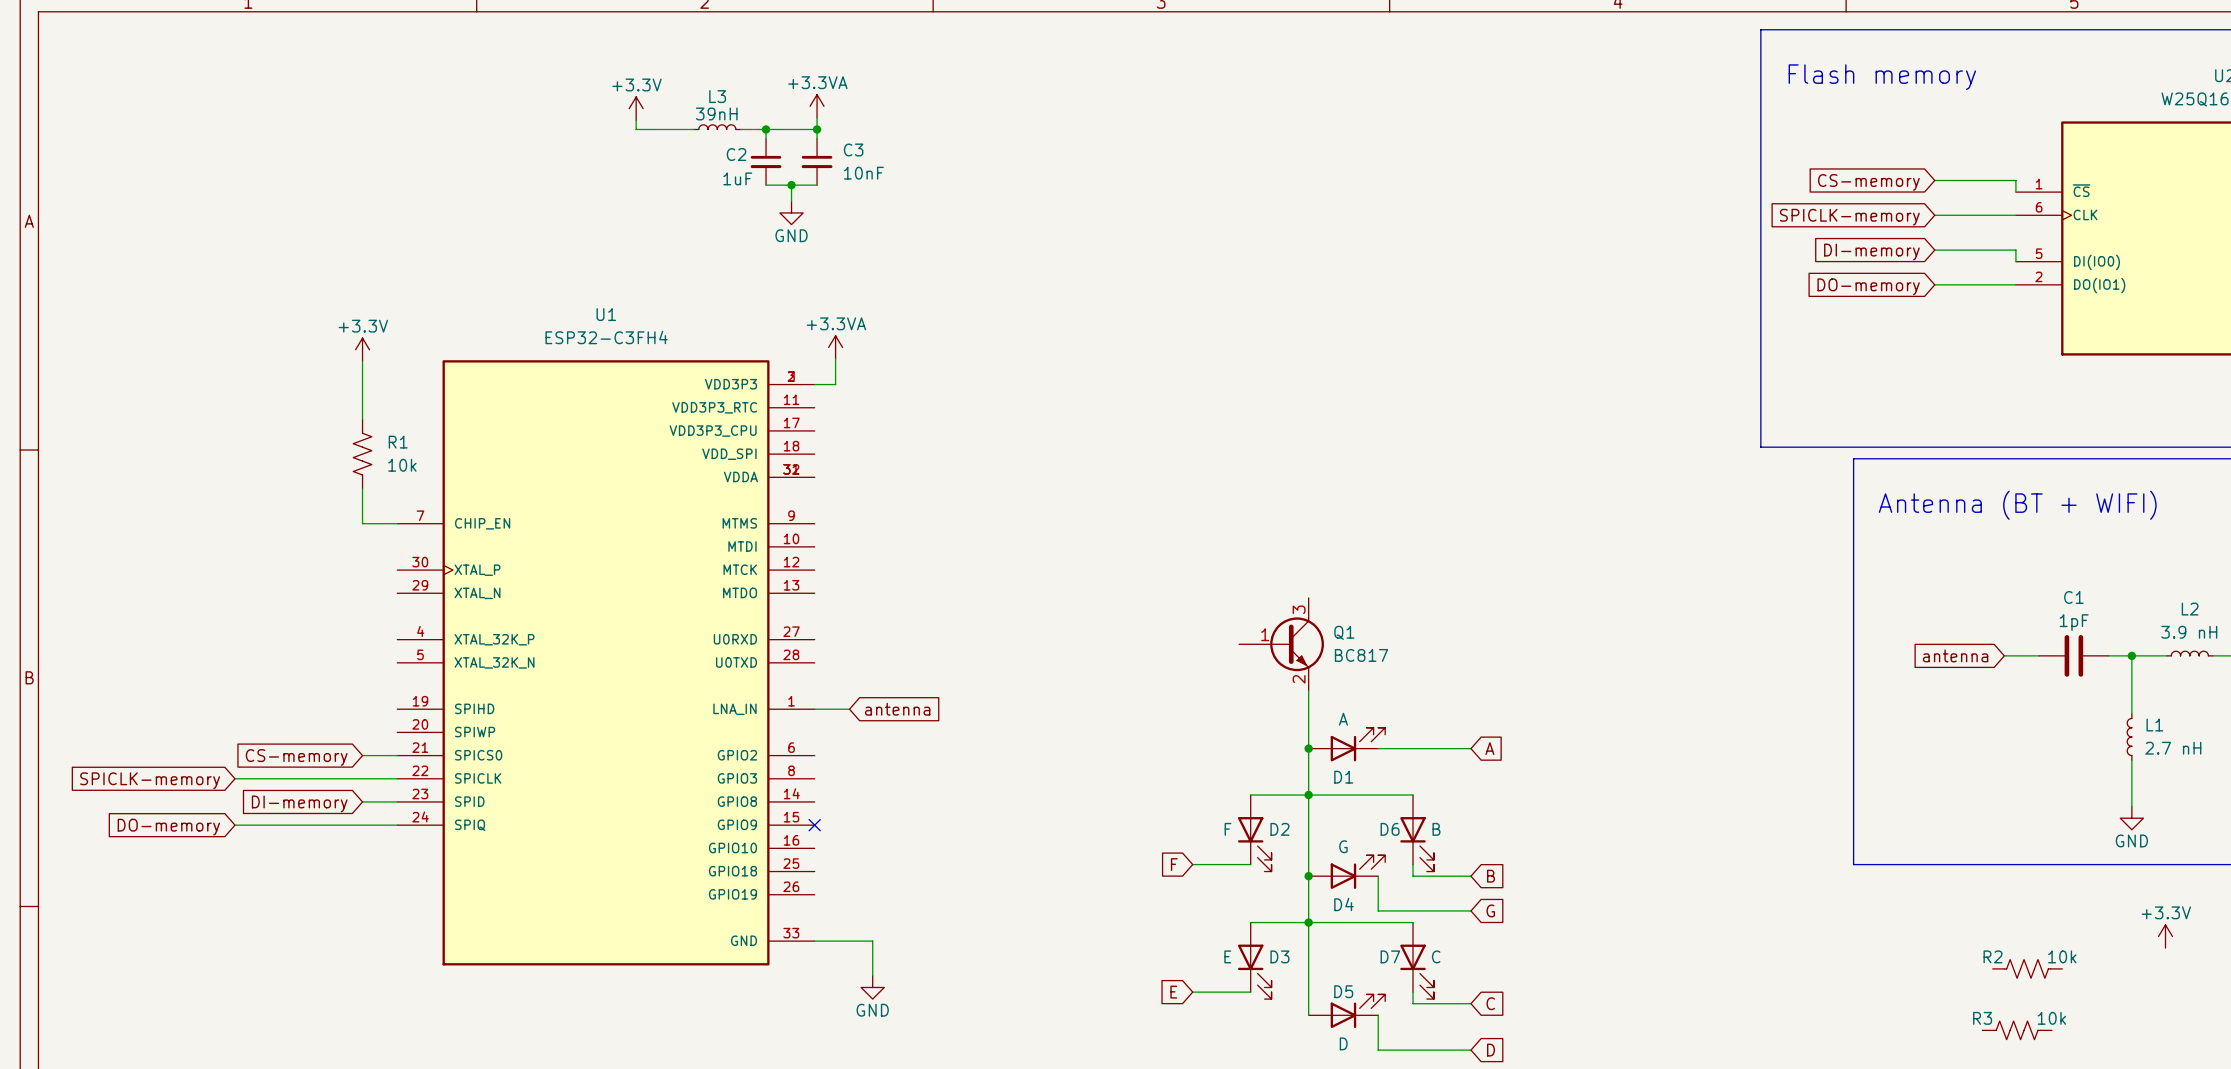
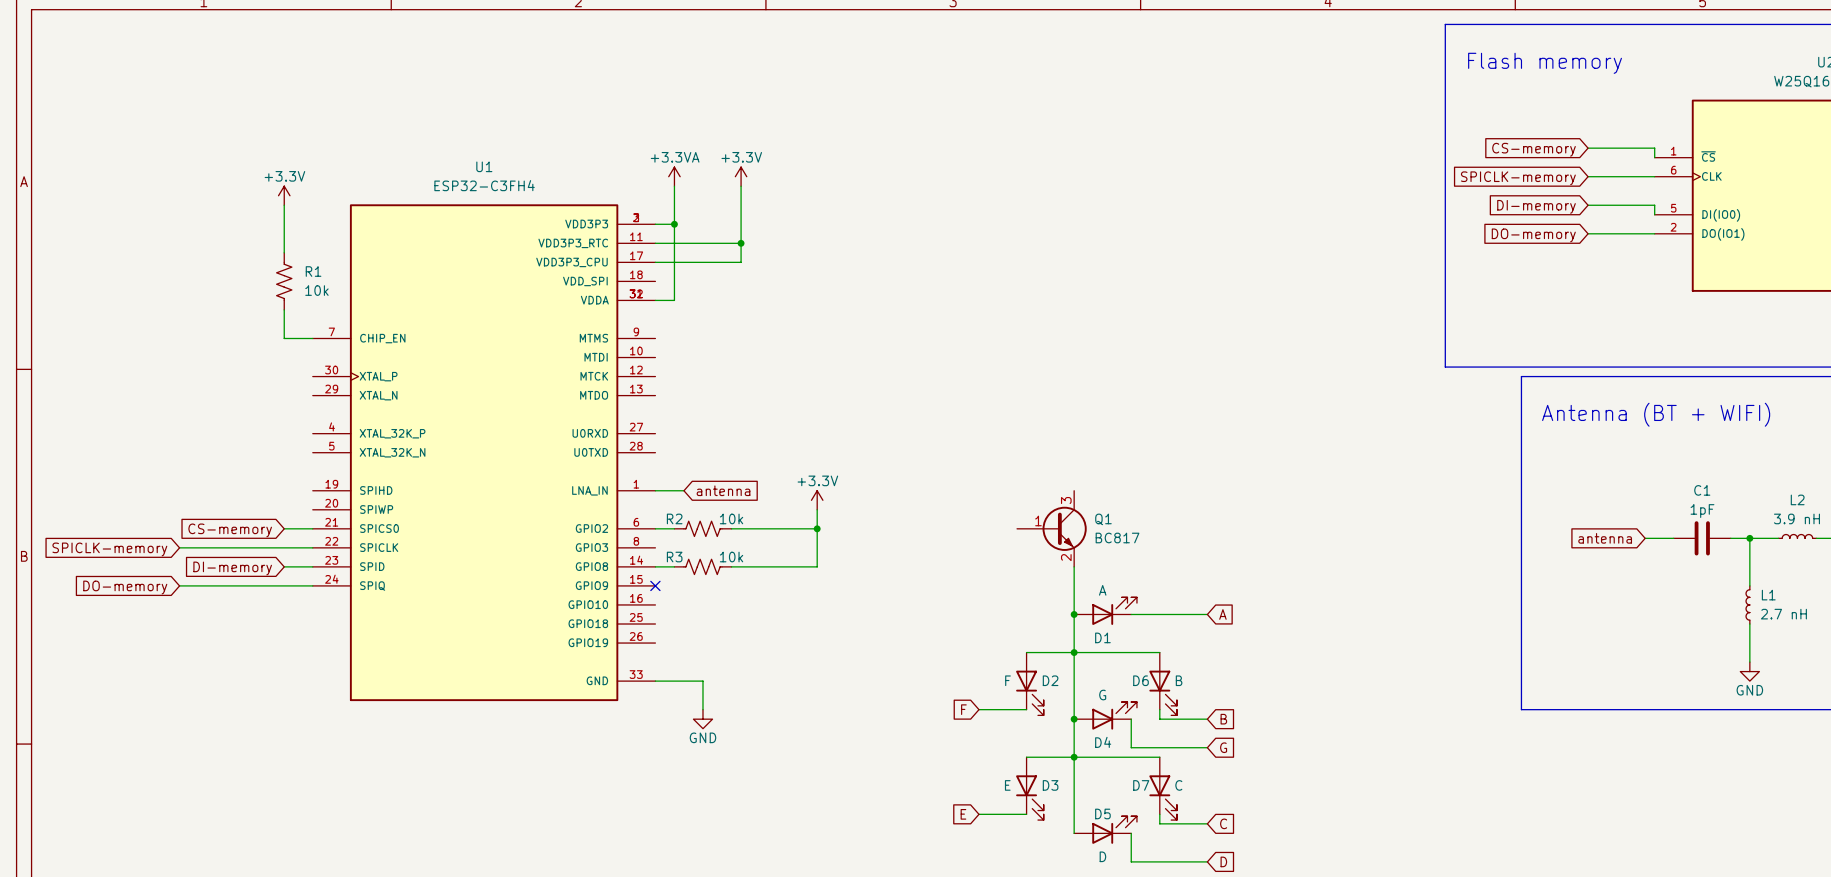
power symbol: +3.3VA (817, 106) -> none
power symbol: +3.3V (636, 108) -> none
wire: (817, 117) (817, 138) -> none
wire: (636, 120) (636, 129) (694, 129) -> none
L3: 39nH (717, 127) -> none
wire: (740, 129) (817, 129) -> none
wire: (766, 129) (766, 138) -> none
junction: (766, 129) -> none
junction: (817, 129) -> none
C2: 1uF (766, 161) -> none
C3: 10nF (817, 161) -> none
wire: (766, 185) (817, 185) -> none
wire: (791, 185) (791, 201) -> none
junction: (791, 185) -> none
power symbol: GND (791, 212) -> none
power symbol: none -> +3.3VA (674, 176)
power symbol: none -> +3.3V (741, 176)
wire: none -> (674, 186) (674, 300) (655, 300)
wire: none -> (741, 186) (741, 262) (655, 262)
wire: none -> (655, 224) (674, 224)
junction: none -> (674, 224)
wire: none -> (655, 243) (741, 243)
junction: none -> (741, 243)
power symbol: +3.3VA (835, 347) -> none
power symbol position: +3.3V (362, 349) -> +3.3V (284, 195)
wire: (835, 359) (835, 384) (814, 384) -> none
wire: (362, 361) (362, 419) -> (284, 205) (284, 252)
R1 position: (362, 454) -> (284, 281)
wire: (362, 488) (362, 523) (397, 523) -> (284, 309) (284, 338) (312, 338)
power symbol: none -> +3.3V (817, 500)
wire: none -> (817, 509) (817, 566) (731, 566)
wire: none -> (655, 528) (674, 528)
wire: none -> (731, 528) (817, 528)
junction: none -> (817, 528)
U1 position: (606, 662) -> (484, 452)
wire: none -> (655, 566) (674, 566)
wire: (814, 709) (849, 709) -> (655, 490) (683, 490)
global label position: antenna (897, 709) -> antenna (723, 490)
no-connect mark: none -> (655, 585)
wire: (362, 755) (397, 755) -> (284, 528) (312, 528)
global label position: CS-memory (296, 757) -> CS-memory (230, 530)
wire: (234, 778) (397, 778) -> (179, 547) (312, 547)
global label position: SPICLK-memory (150, 780) -> SPICLK-memory (109, 549)
wire: (362, 801) (397, 801) -> (284, 566) (312, 566)
global label position: DI-memory (299, 803) -> DI-memory (232, 568)
wire: (234, 825) (397, 825) -> (179, 585) (312, 585)
no-connect mark: (814, 825) -> none
global label position: DO-memory (168, 827) -> DO-memory (125, 587)
power symbol: +3.3V (2165, 936) -> none
wire: (814, 941) (872, 941) (872, 975) -> (655, 681) (702, 681) (702, 709)
R2 position: (2027, 968) -> (702, 528)
power symbol position: GND (872, 987) -> GND (702, 719)
R3 position: (2017, 1030) -> (702, 566)

